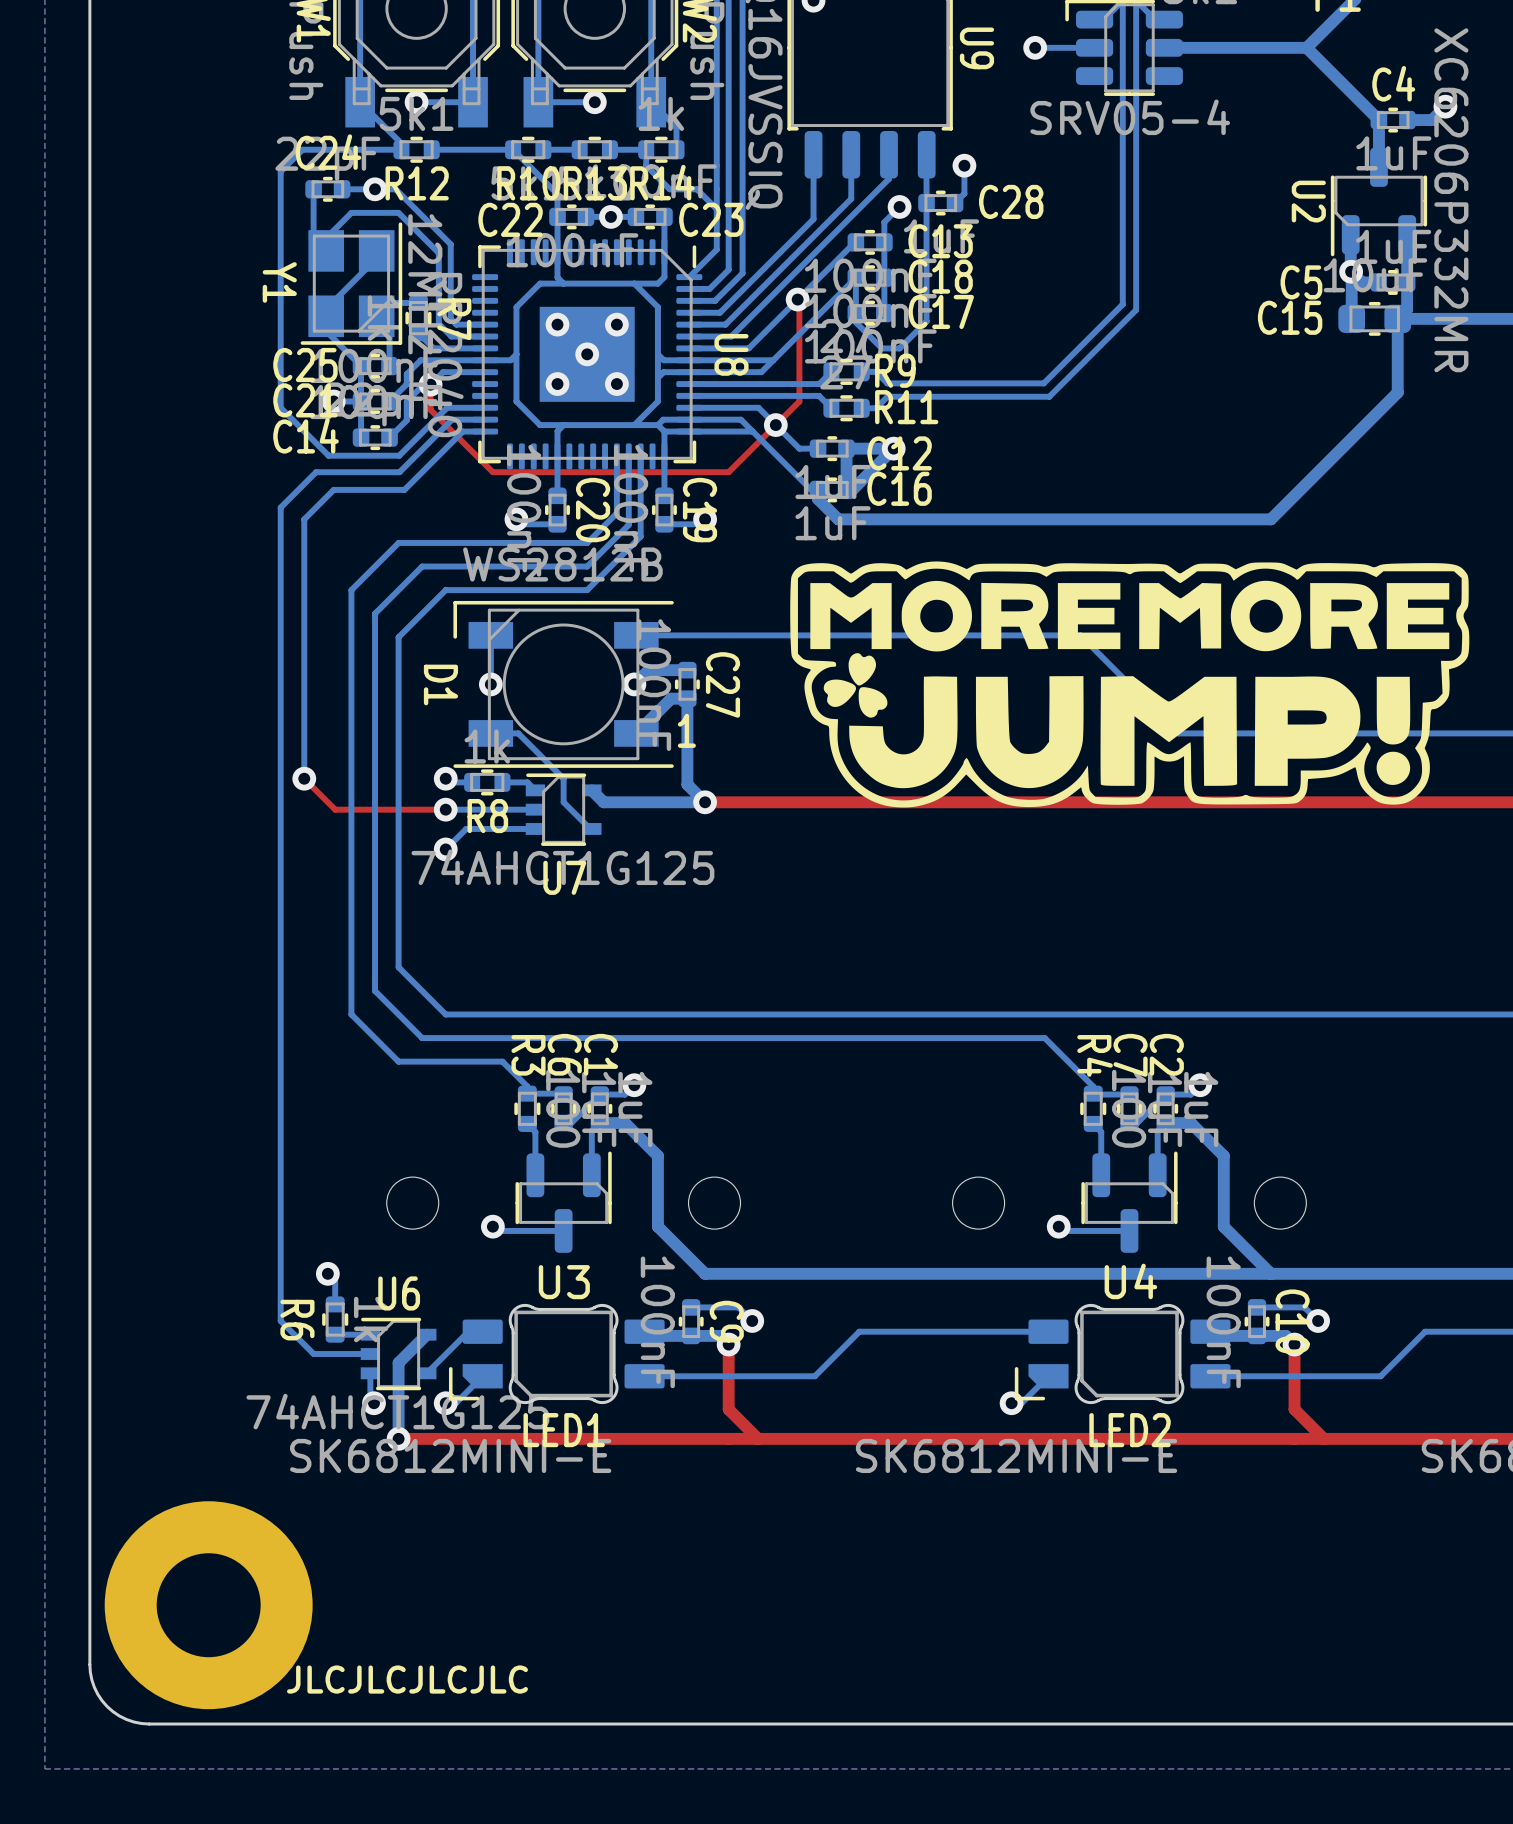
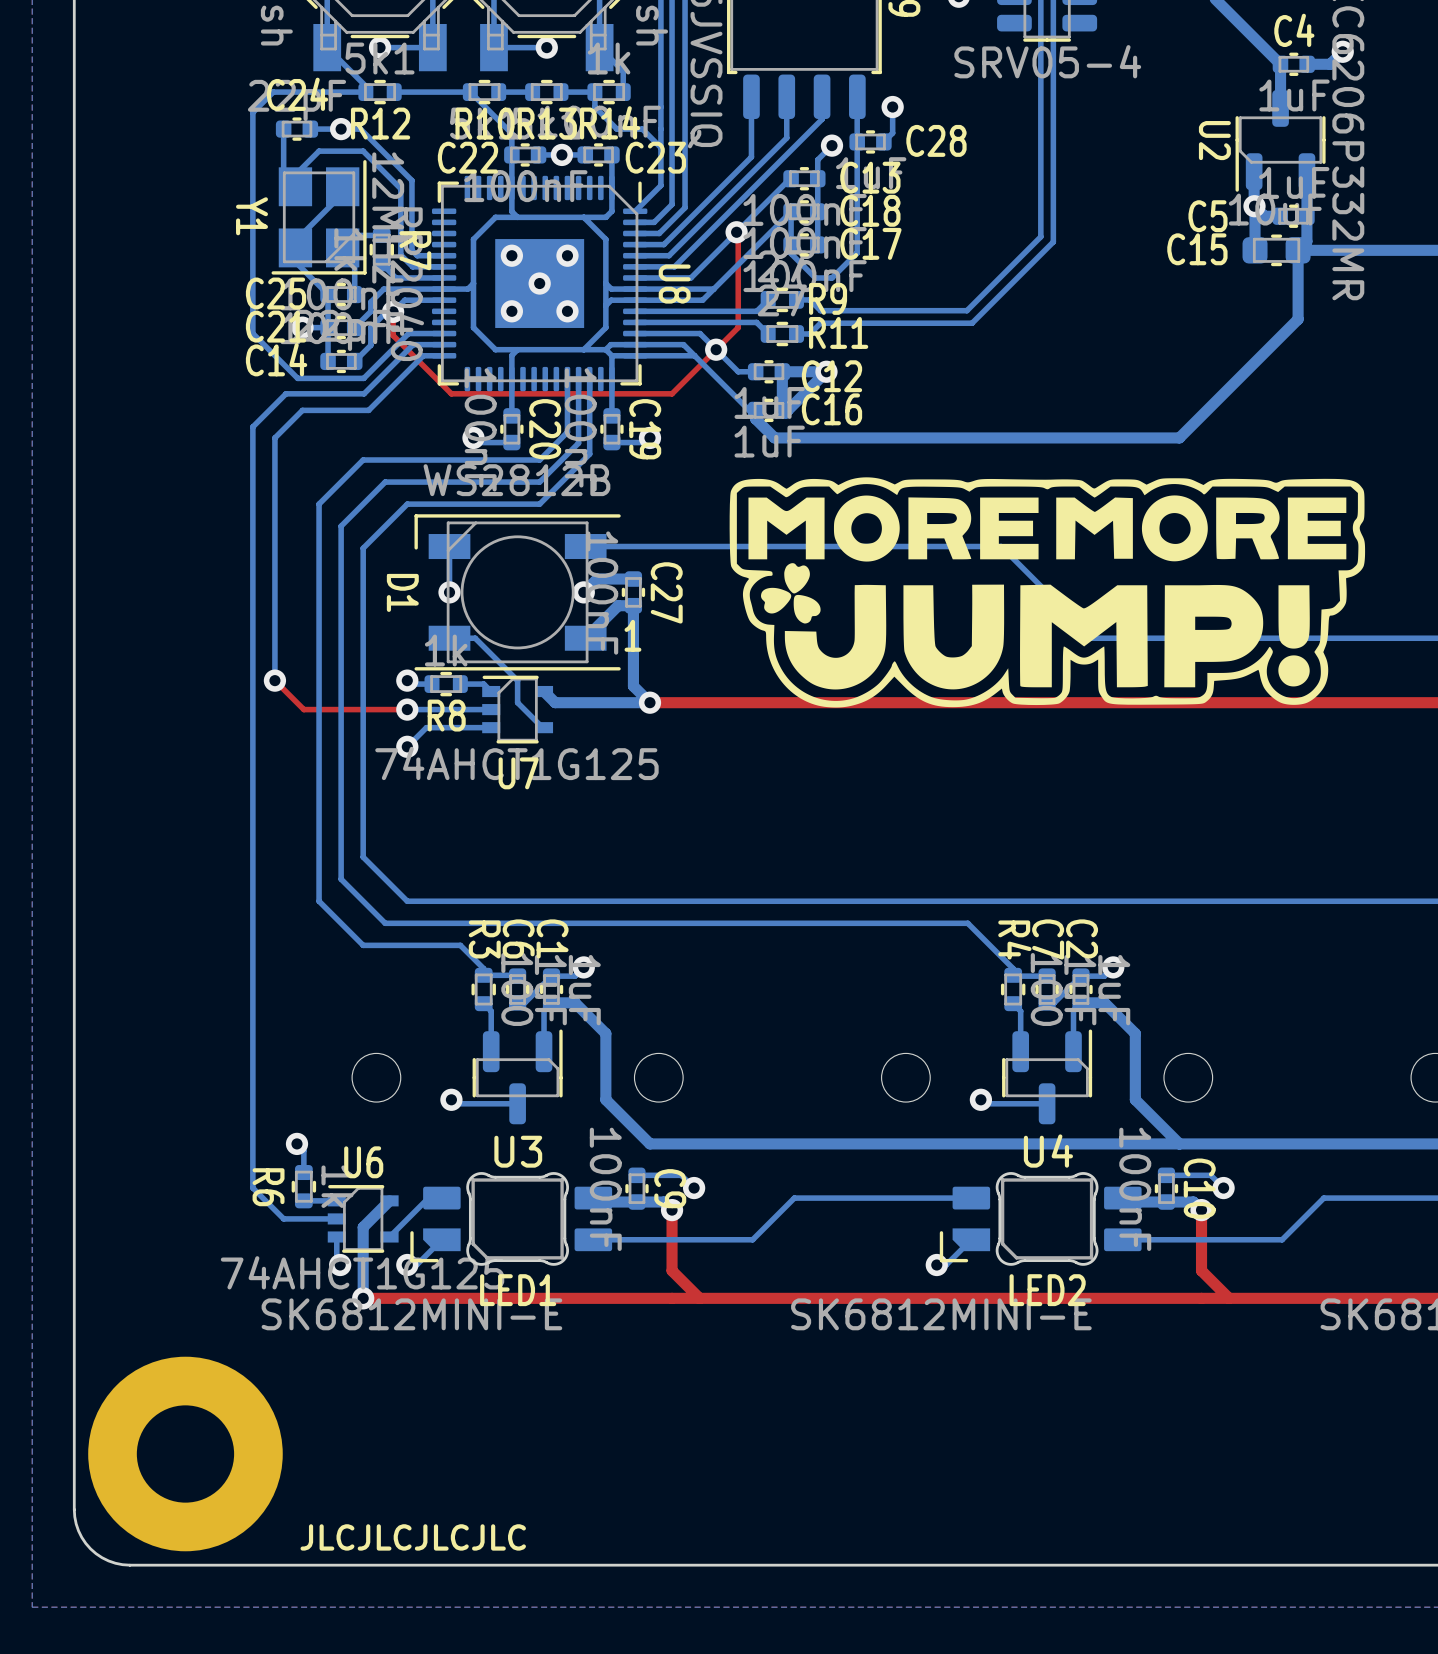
text position: JLCJLCJLCJLC (407, 1679) -> JLCJLCJLCJLC (413, 1537)

